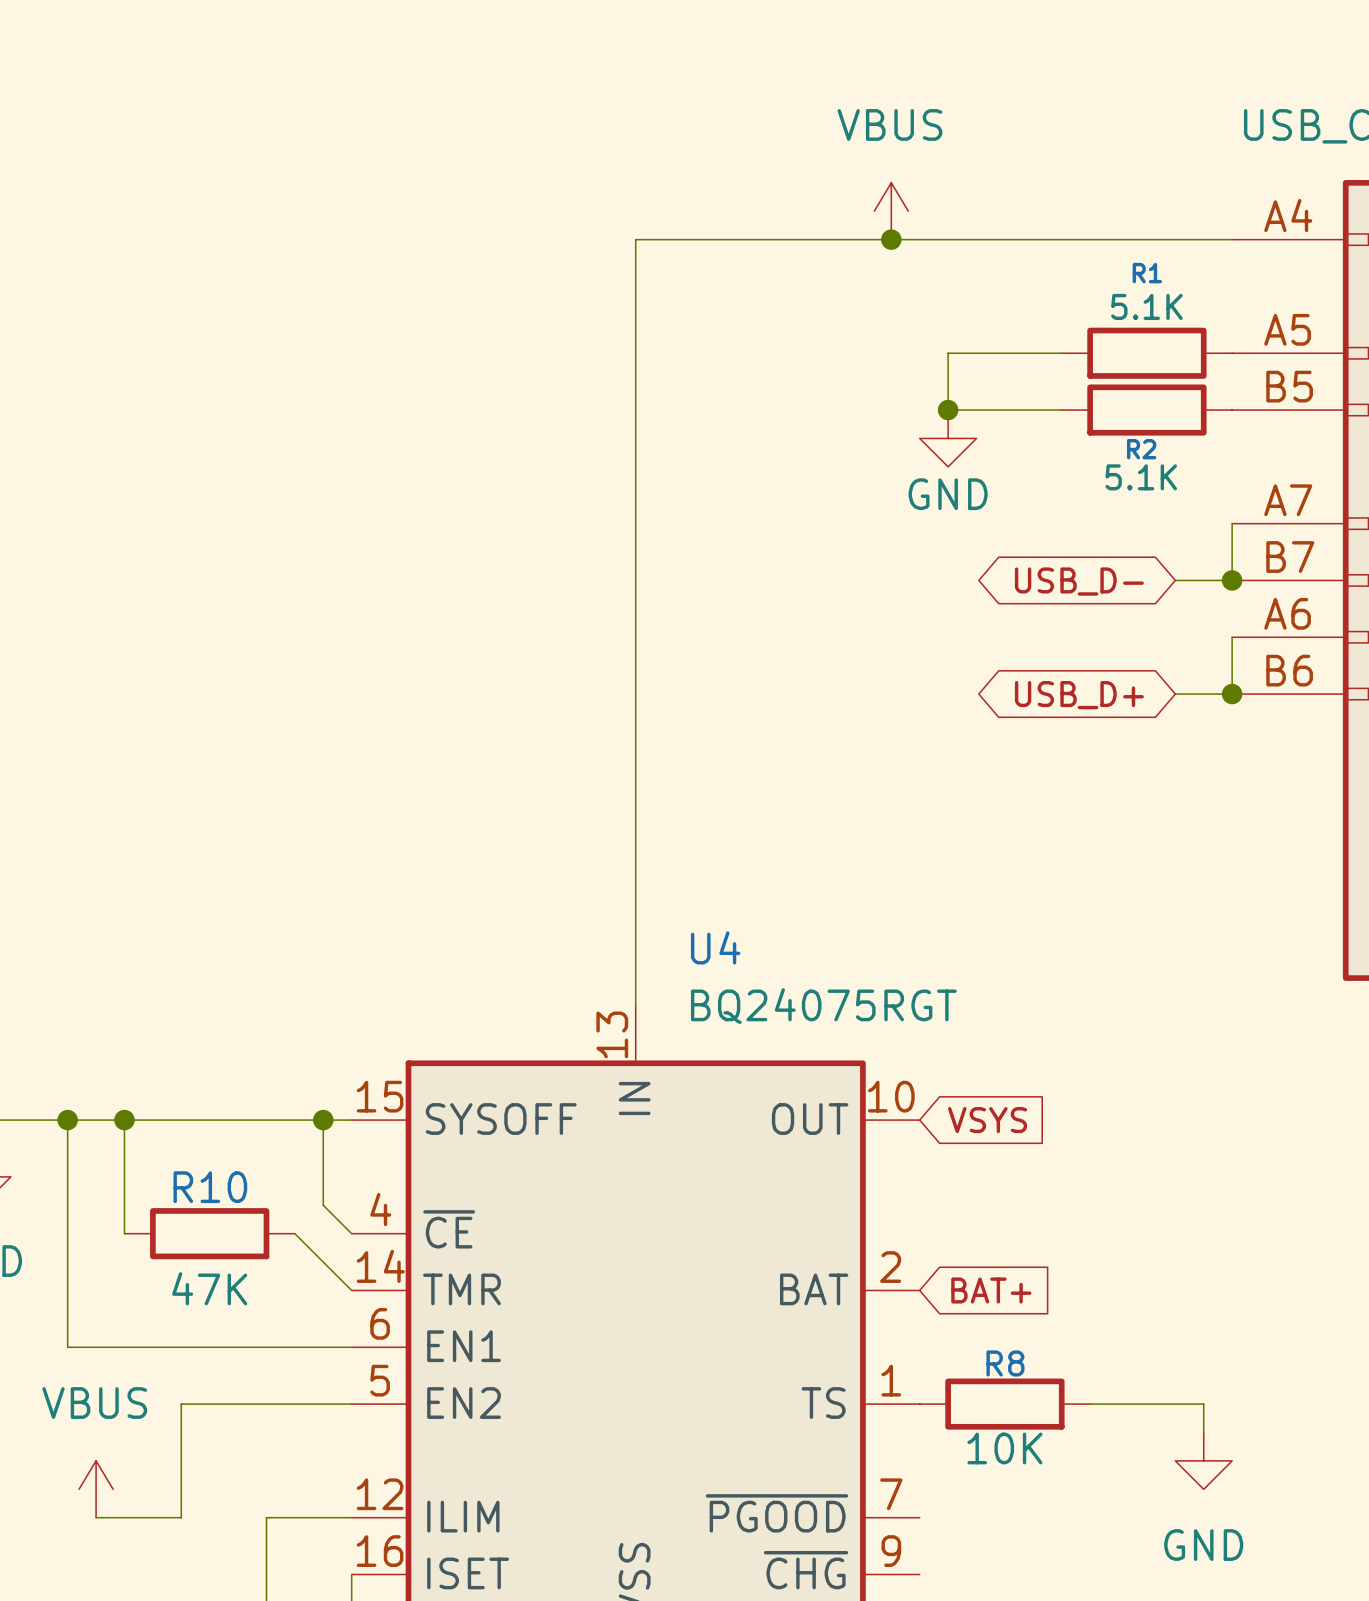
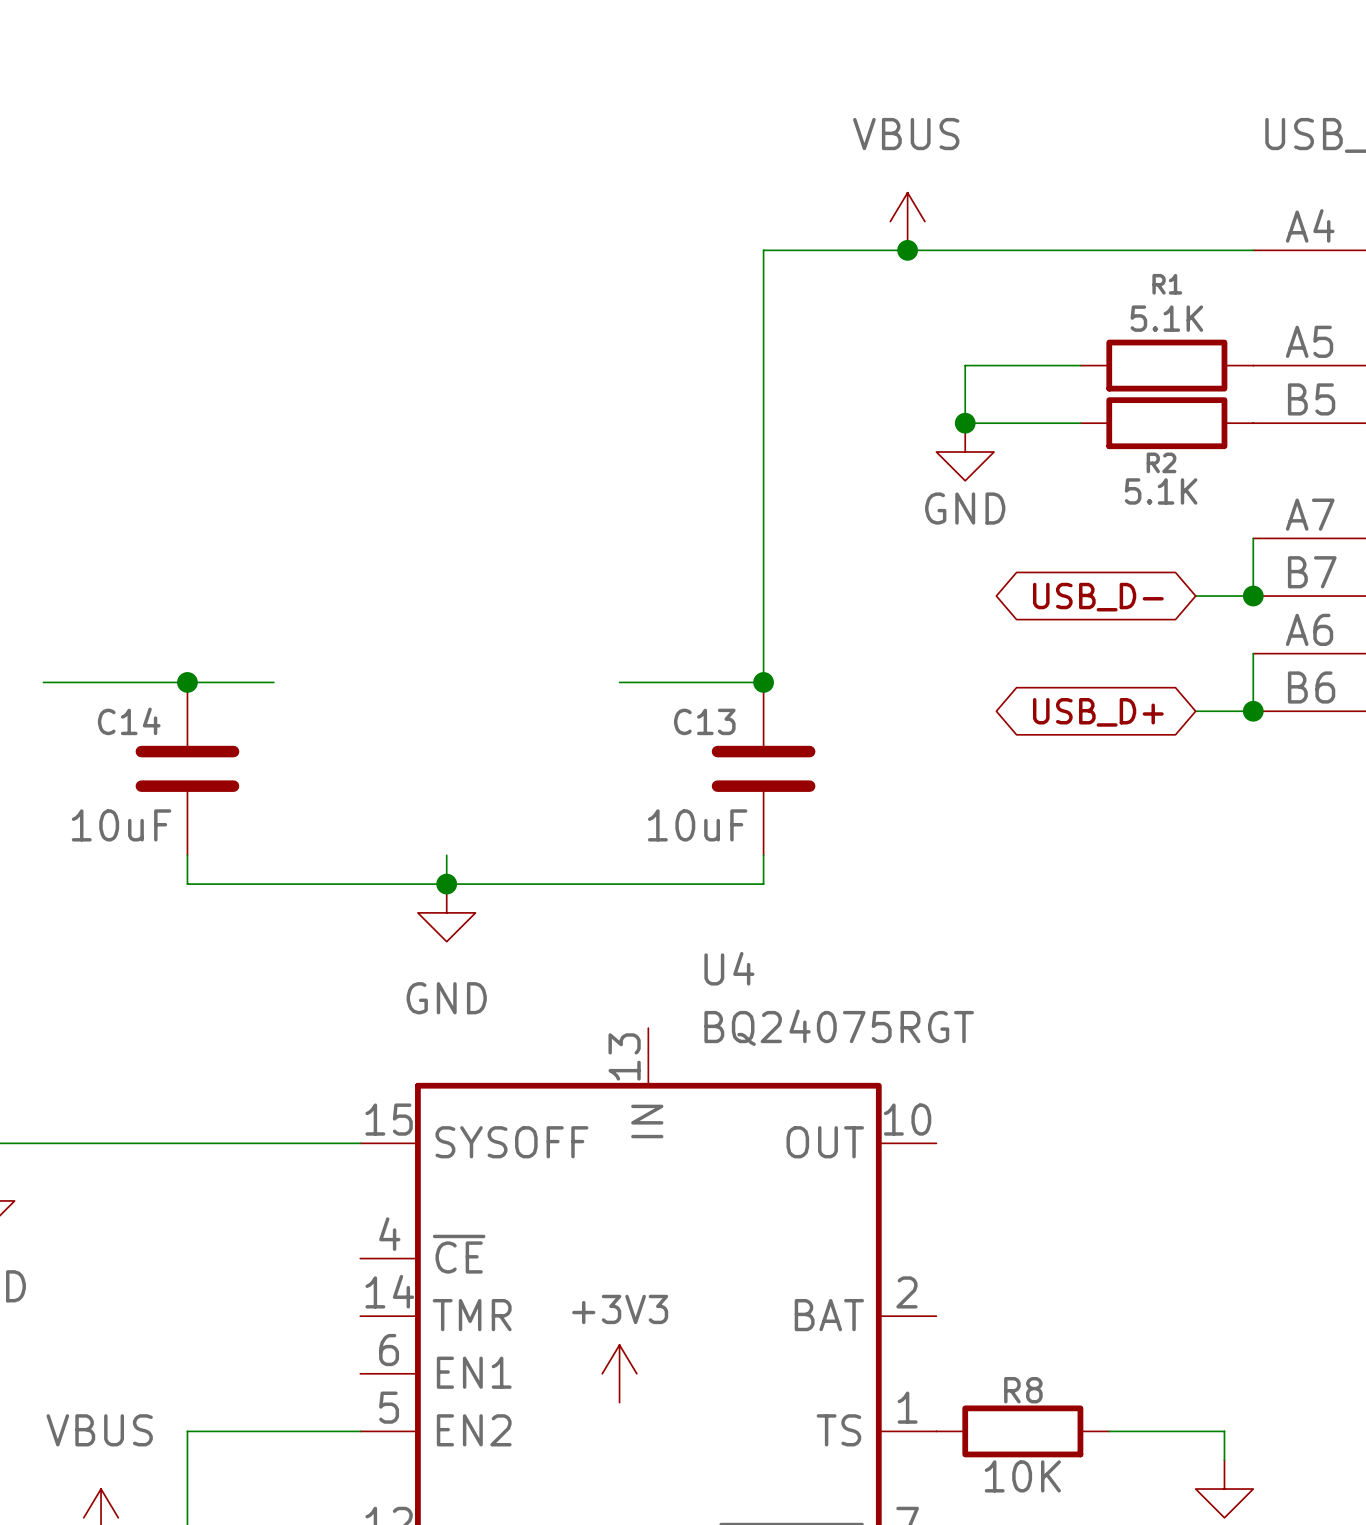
wire: (749, 239) (635, 239) (635, 1006) -> (763, 250) (763, 682) (619, 682)
wire: none -> (43, 682) (273, 682)
junction: none -> (187, 682)
junction: none -> (763, 682)
C14: none -> 10uF (187, 768)
C13: none -> 10uF (763, 768)
wire: none -> (187, 855) (187, 884) (763, 884) (763, 855)
wire: none -> (446, 855) (446, 884)
junction: none -> (446, 884)
power symbol: none -> GND (446, 912)
wire: (67, 1120) (67, 1347) (351, 1347) -> none
junction: (67, 1120) -> none
wire: (124, 1120) (124, 1233) -> none
junction: (124, 1120) -> none
wire: (323, 1120) (323, 1205) (351, 1233) -> none
junction: (323, 1120) -> none
global label: VSYS (987, 1120) -> none
R10: 47K (209, 1233) -> none
wire: (294, 1233) (351, 1290) -> none
global label: BAT+ (991, 1290) -> none
power symbol: none -> +3V3 (619, 1373)

